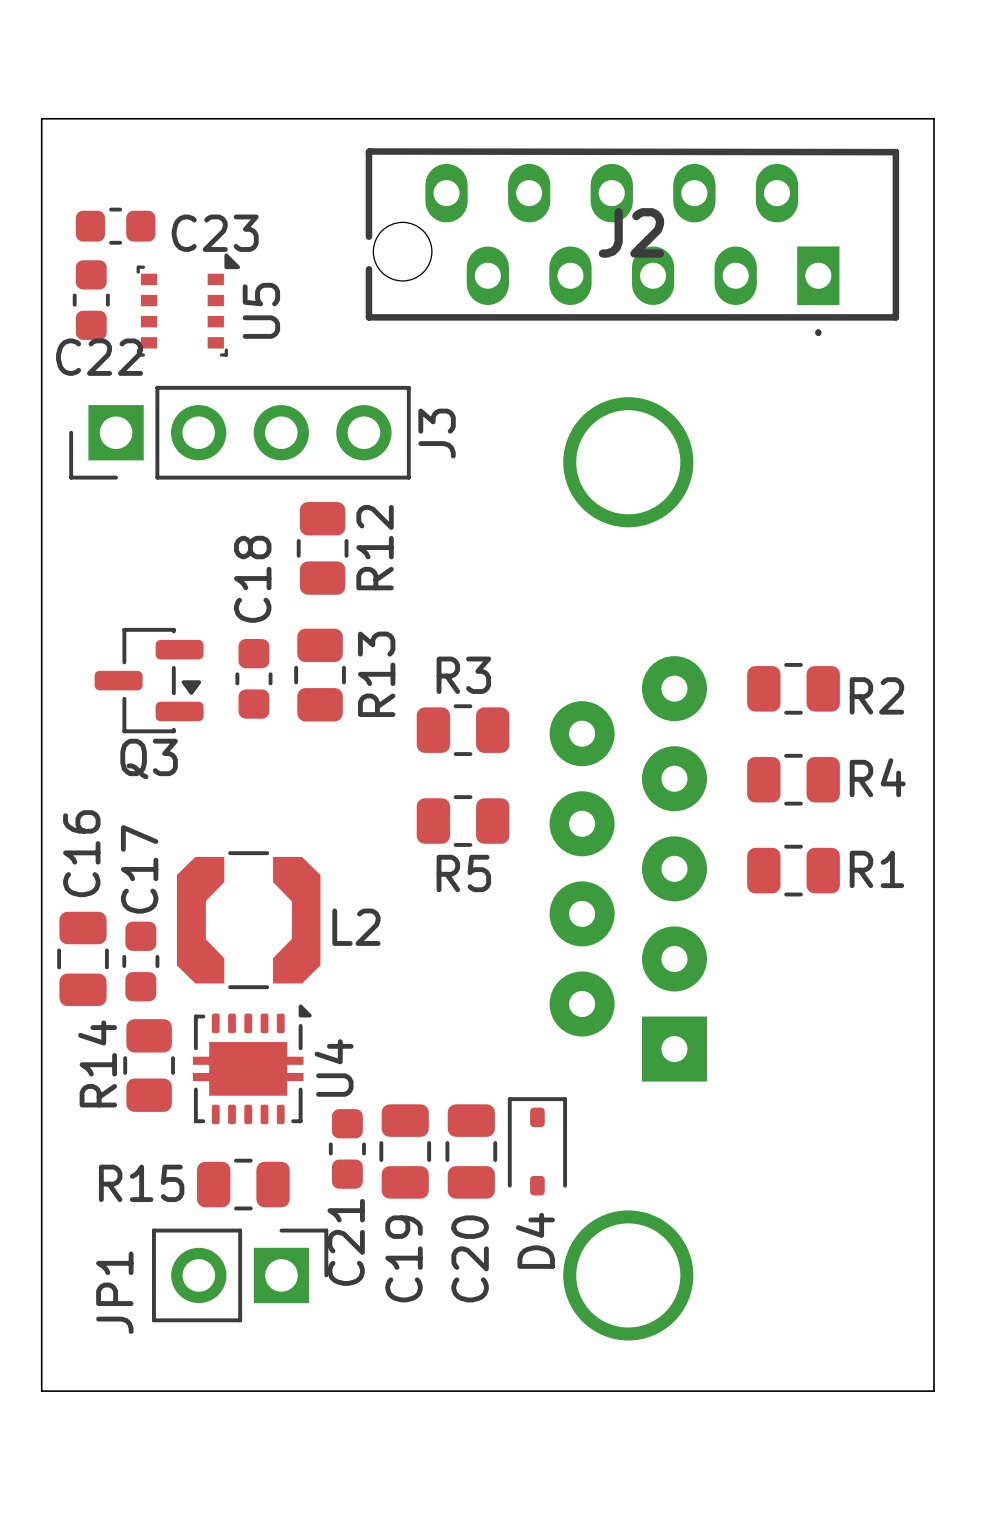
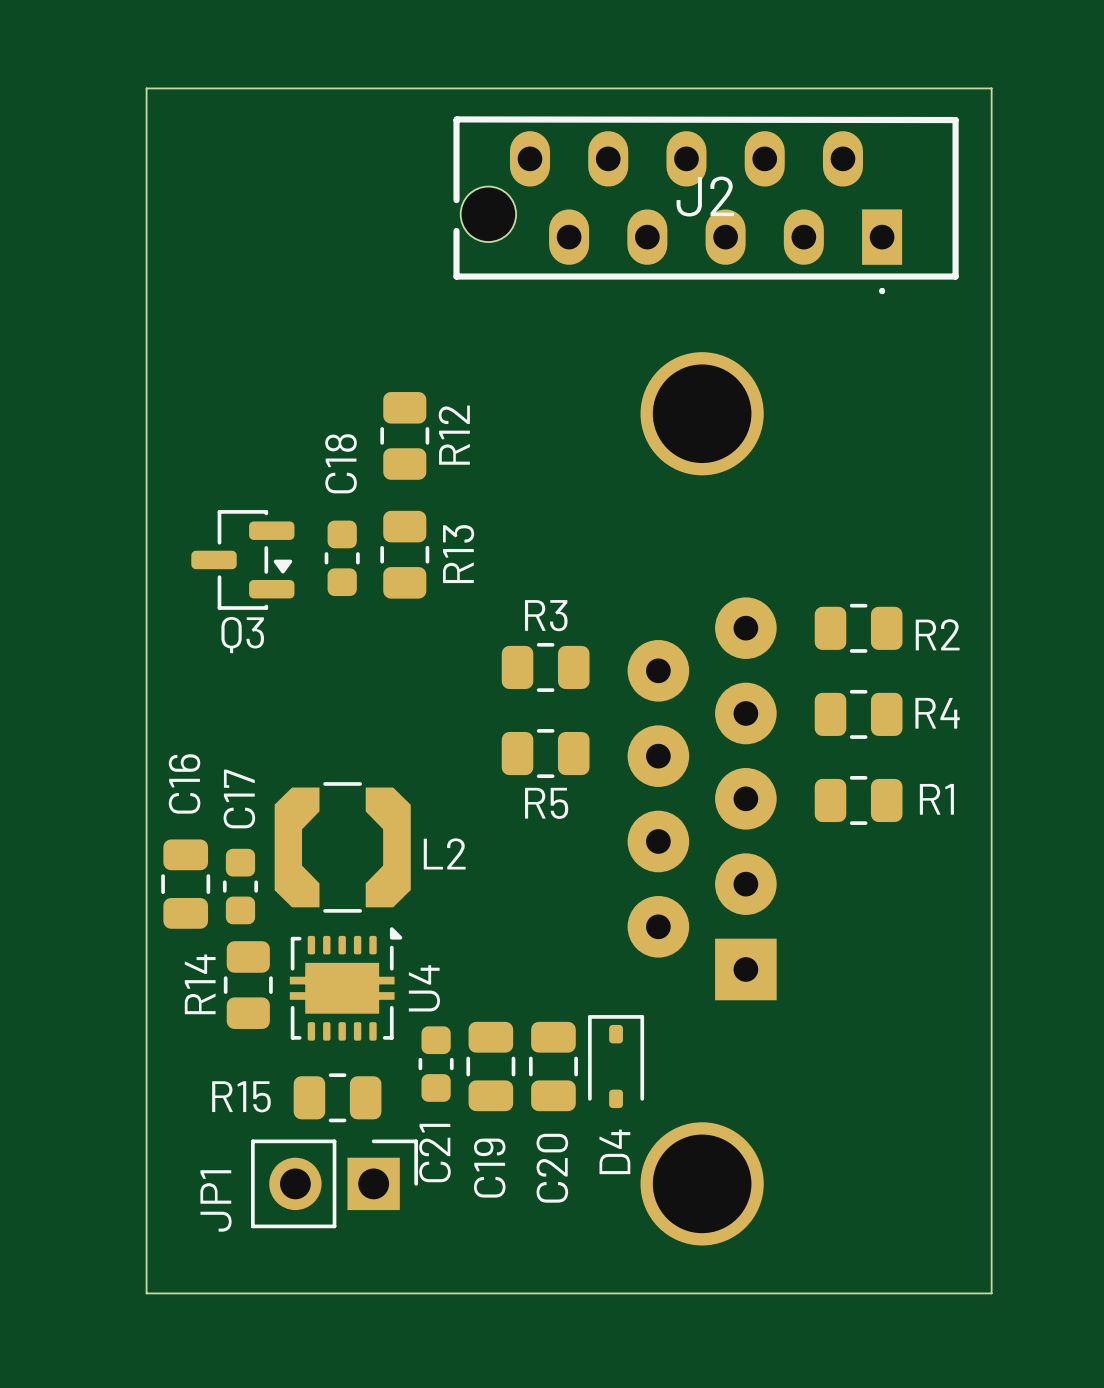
C23: (115, 226) -> none
C22: (91, 300) -> none
U5: (188, 305) -> none
J3: (239, 432) -> none
R12 position: (322, 548) -> (404, 435)
R13 position: (320, 675) -> (404, 554)
C18 position: (253, 678) -> (342, 558)
Q3 position: (149, 680) -> (242, 559)

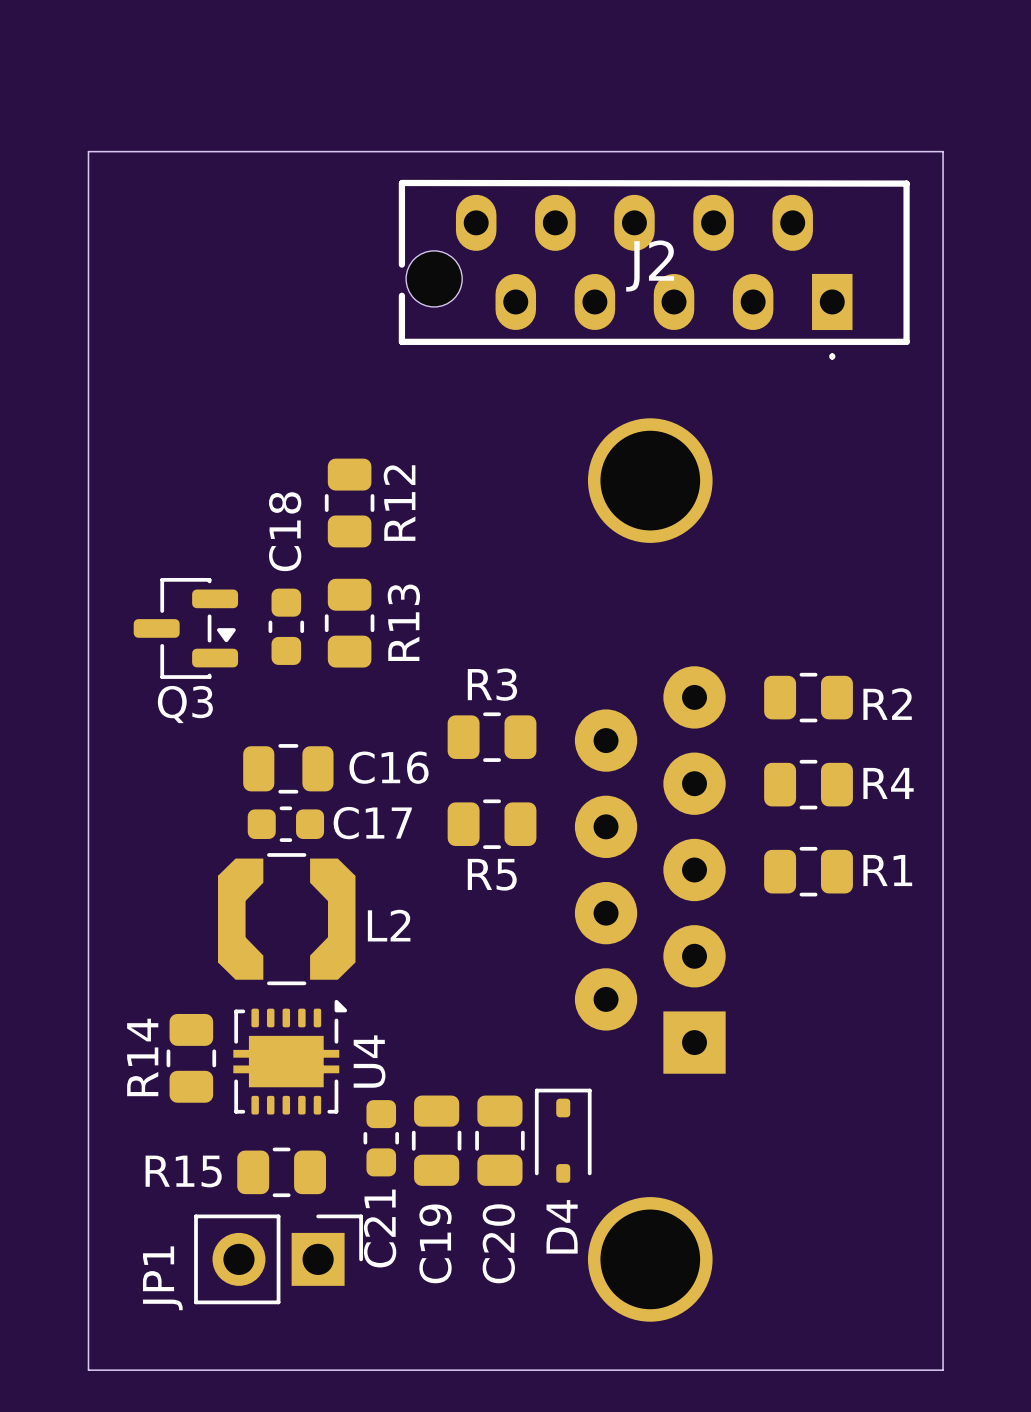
C16 rotation: 0° (185, 884) -> 90° clockwise (288, 768)
C16 position: (185, 884) -> (288, 768)
C17 rotation: 0° (240, 886) -> 90° clockwise (285, 824)
C17 position: (240, 886) -> (285, 824)

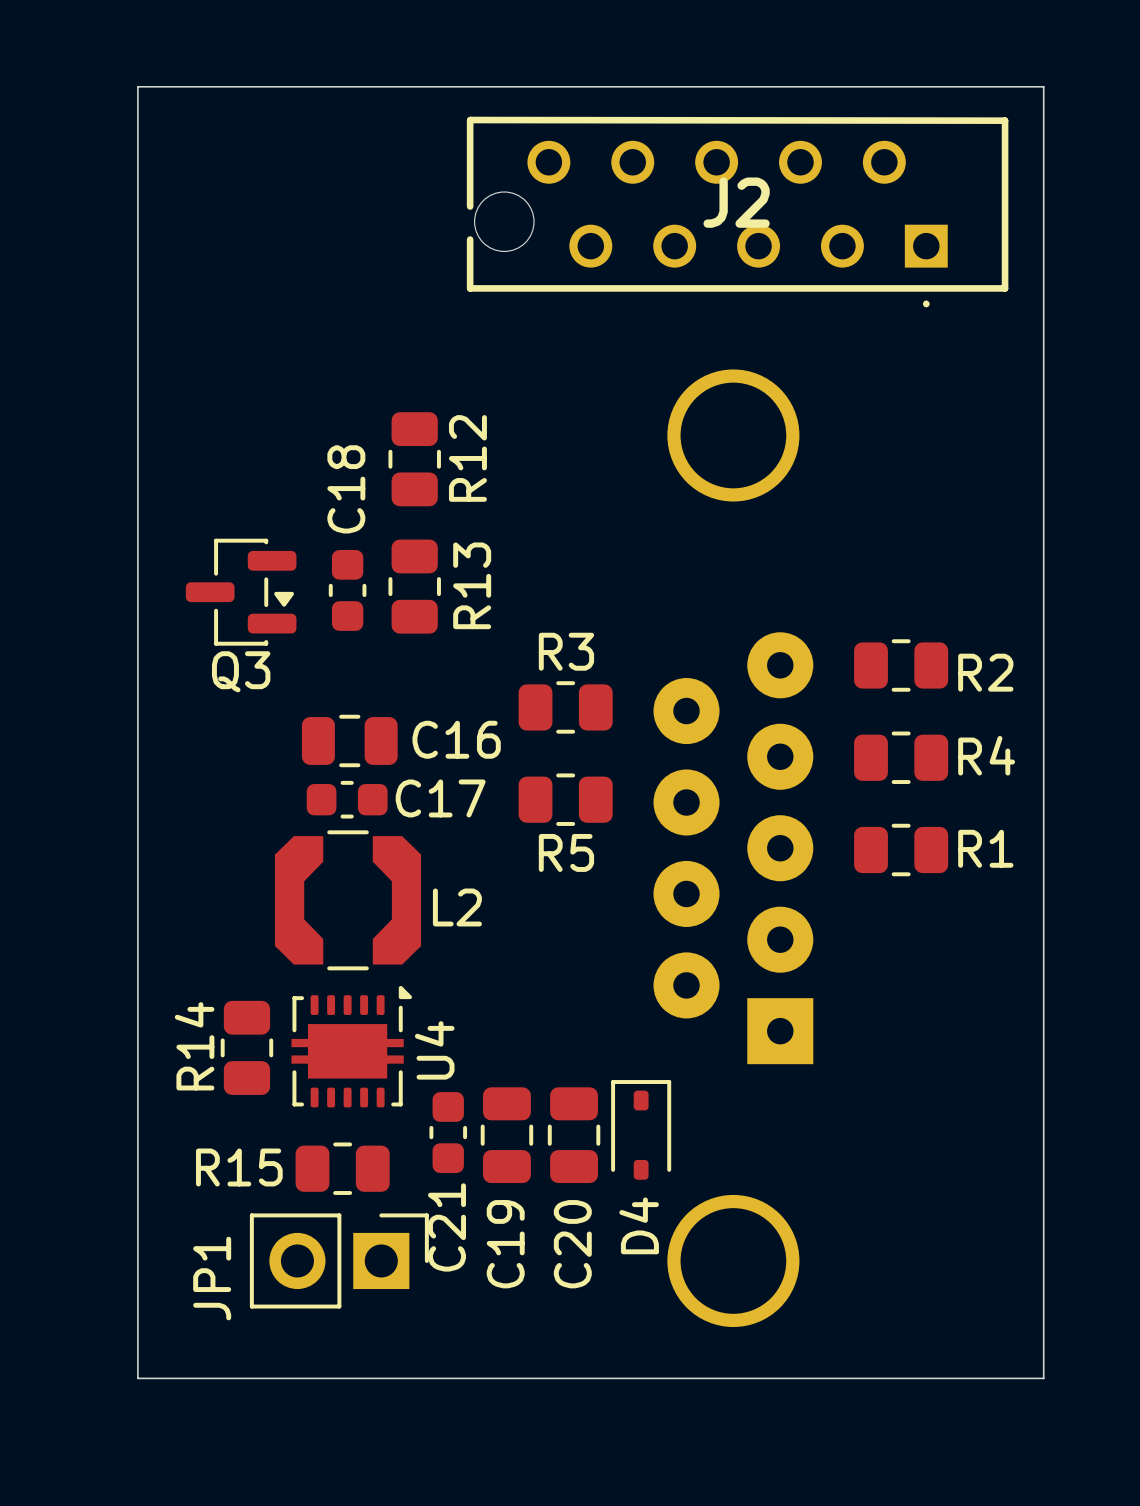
J2 footprint: [398, 179, 910, 360] -> [466, 116, 1009, 308]

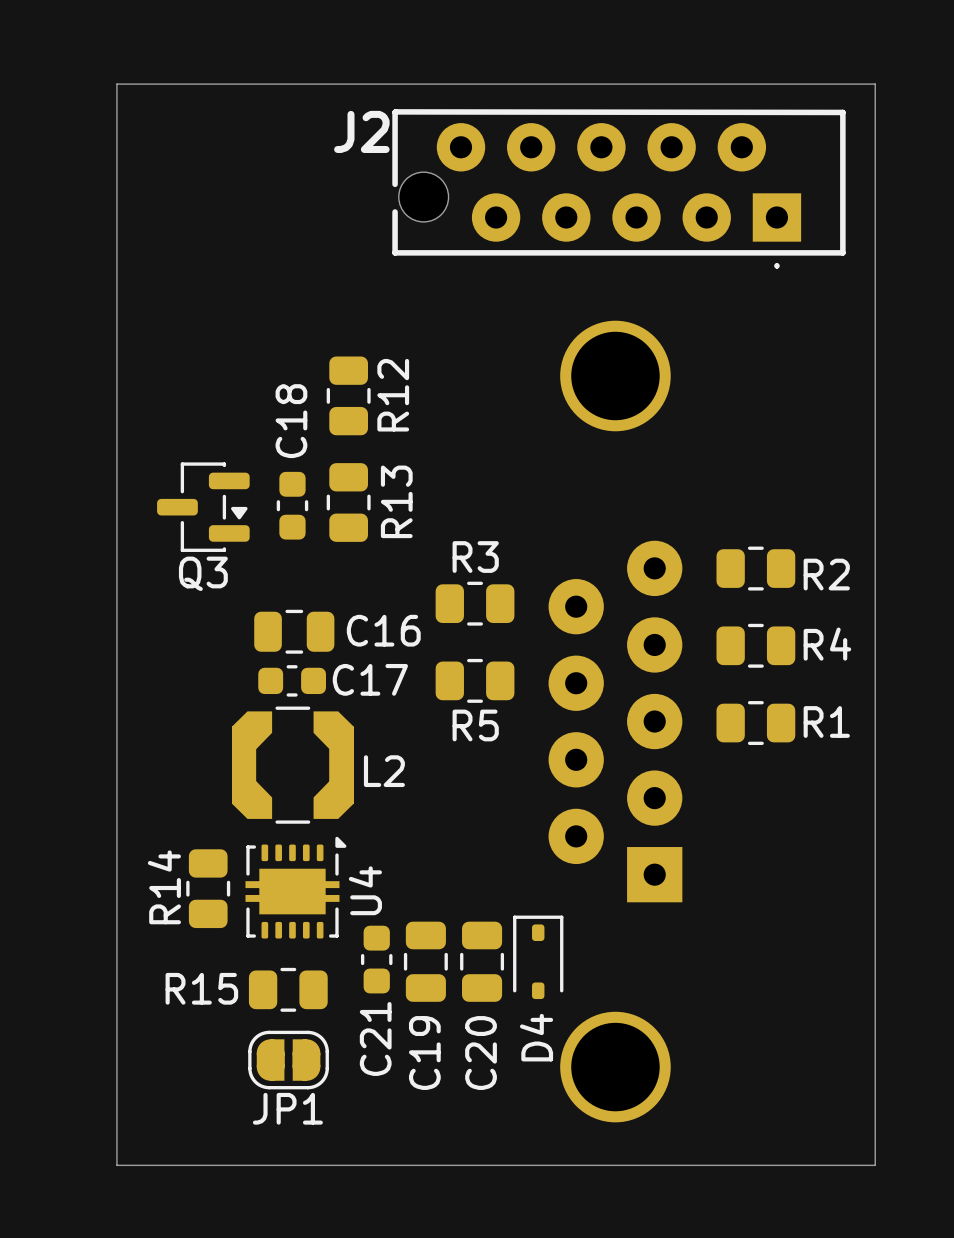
J2 footprint: [466, 116, 1009, 308] -> [392, 109, 846, 269]
J2 name position: J2 (736, 202) -> J2 (361, 131)
JP1 footprint: [249, 1213, 429, 1309] -> [248, 1030, 329, 1090]
JP1 name position: JP1 (212, 1278) -> JP1 (287, 1108)

